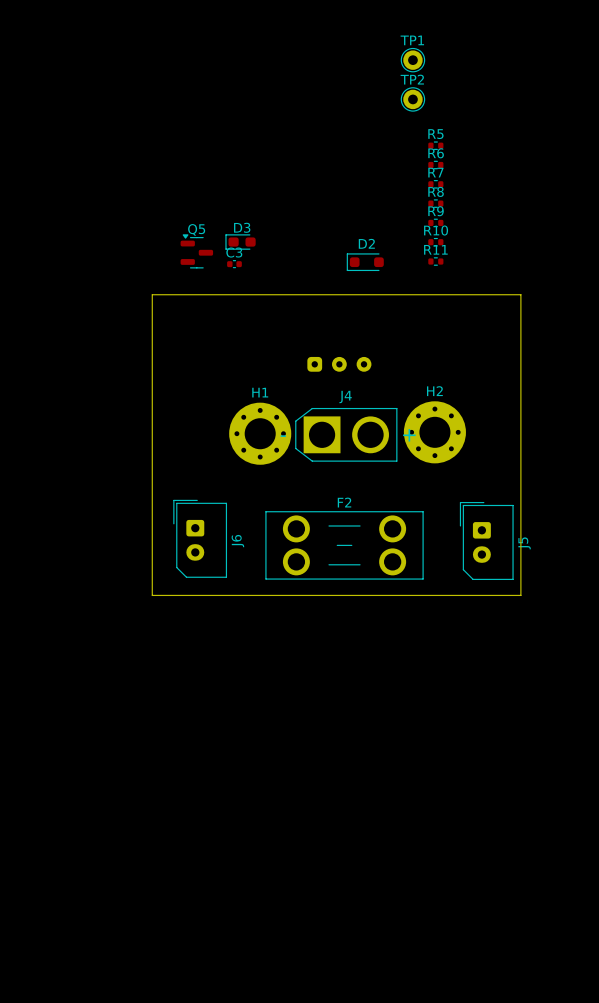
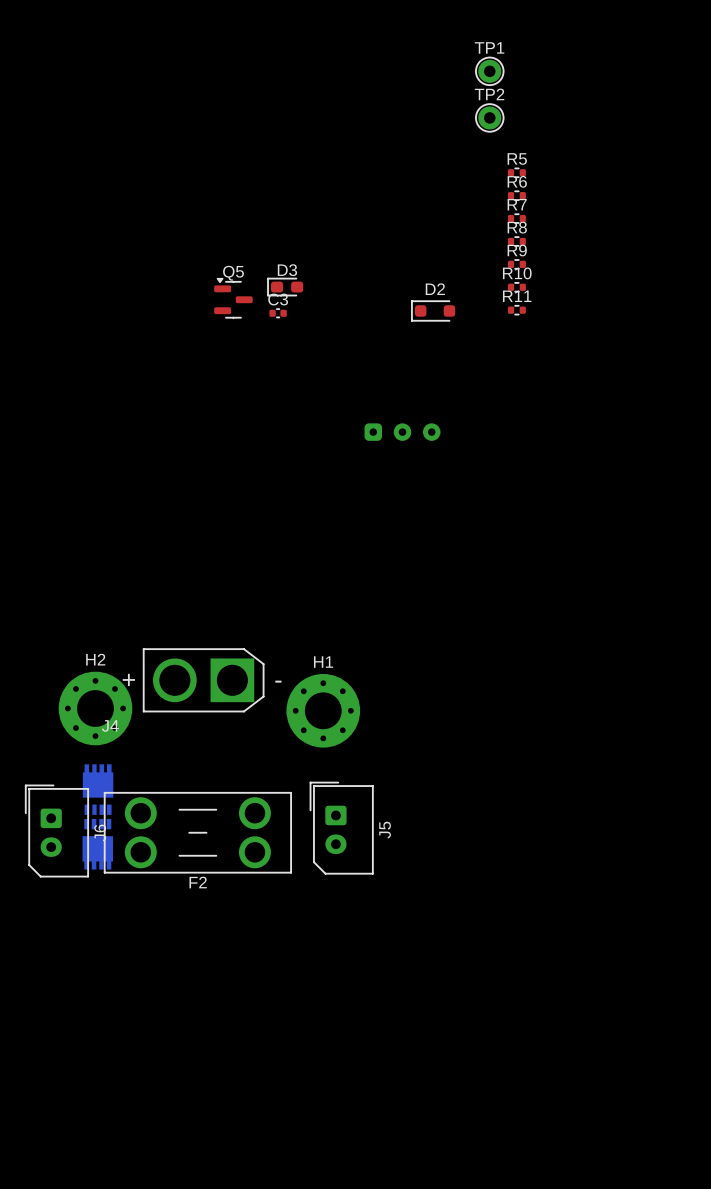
board edge: (152, 294) (520, 294) (520, 595) (152, 595) (152, 294) -> none
J4 name position: J4 (345, 397) -> J4 (110, 725)
H2 position: (434, 432) -> (95, 708)
H1 position: (260, 433) -> (323, 710)
J4 rotation: 0° (346, 434) -> 180° (203, 680)
J4 position: (346, 434) -> (203, 680)
F2 name position: F2 (344, 502) -> F2 (198, 882)
J6 position: (200, 538) -> (56, 831)
J5 position: (486, 540) -> (341, 828)
F2 position: (344, 545) -> (197, 832)
part: none -> (98, 789)
part: none -> (97, 844)

